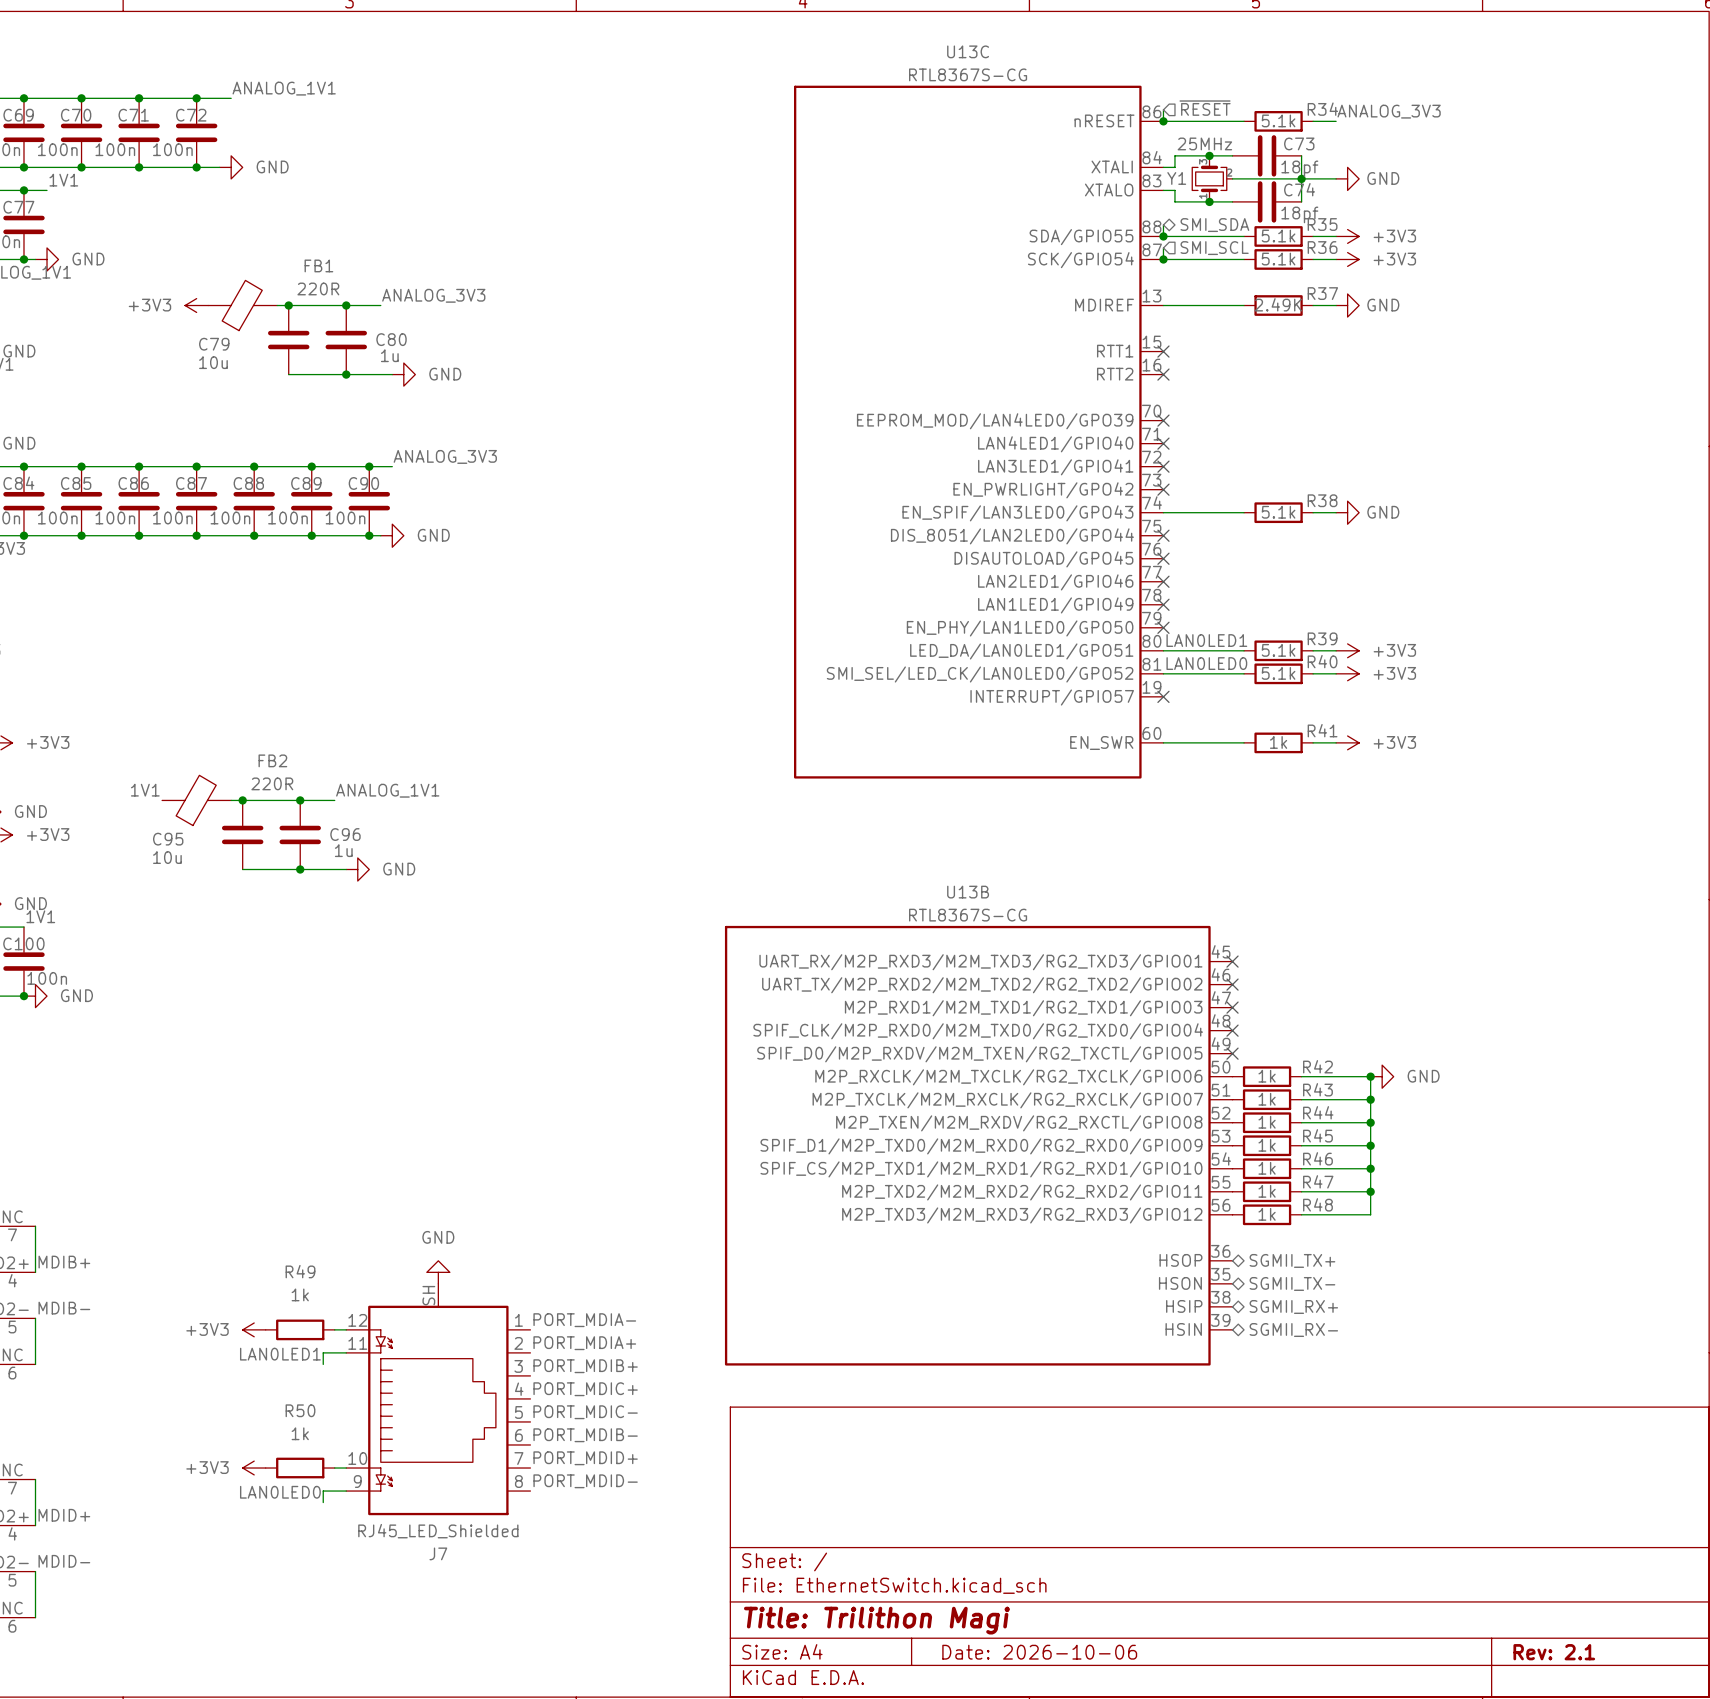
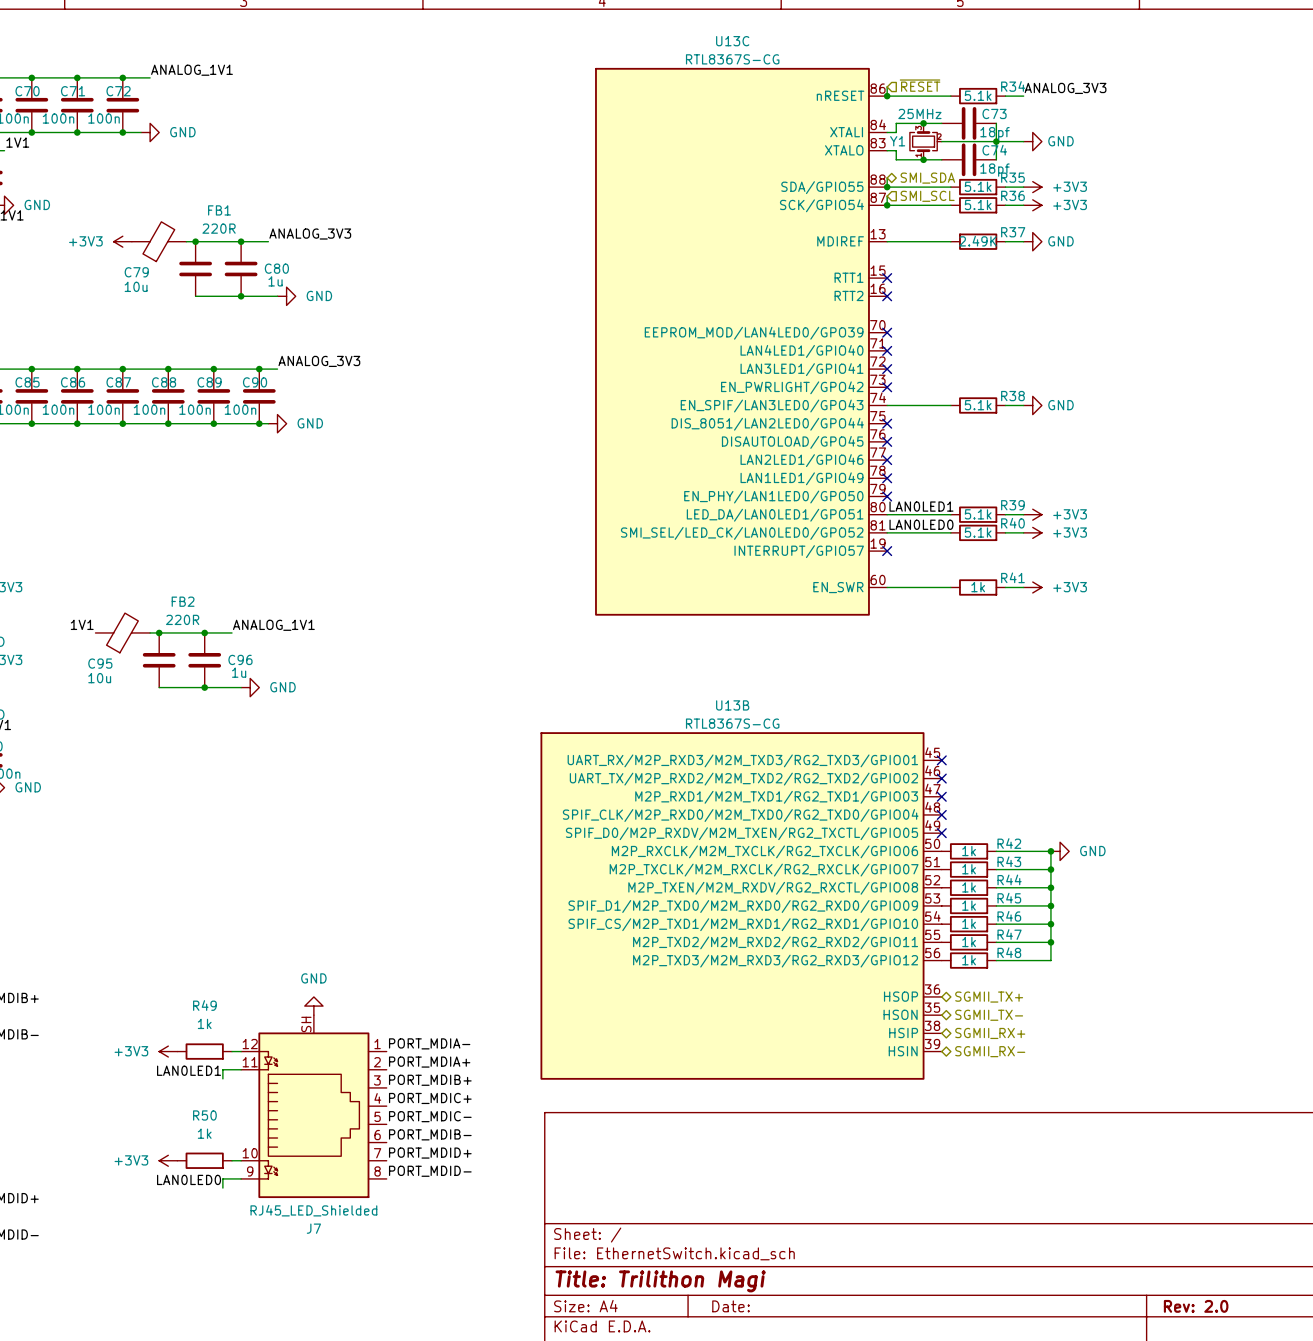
title block: Date: 2026-10-06 (1039, 1652) -> Date: (730, 1306)
title block: Rev: 2.1 (1554, 1652) -> Rev: 2.0 (1196, 1306)

